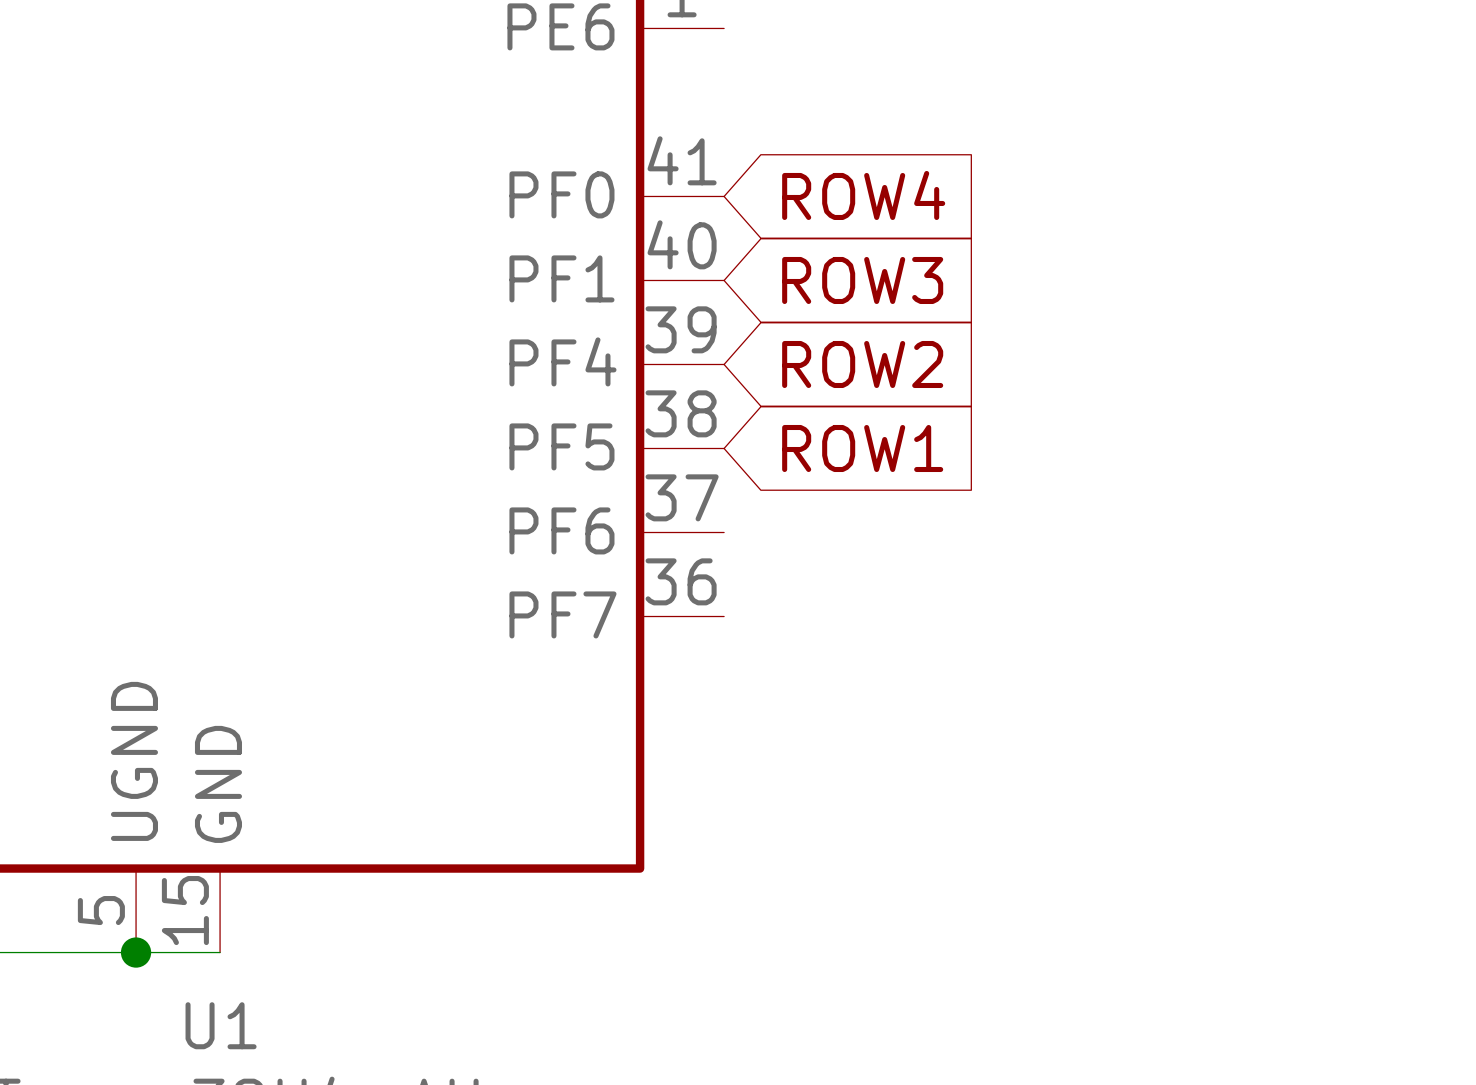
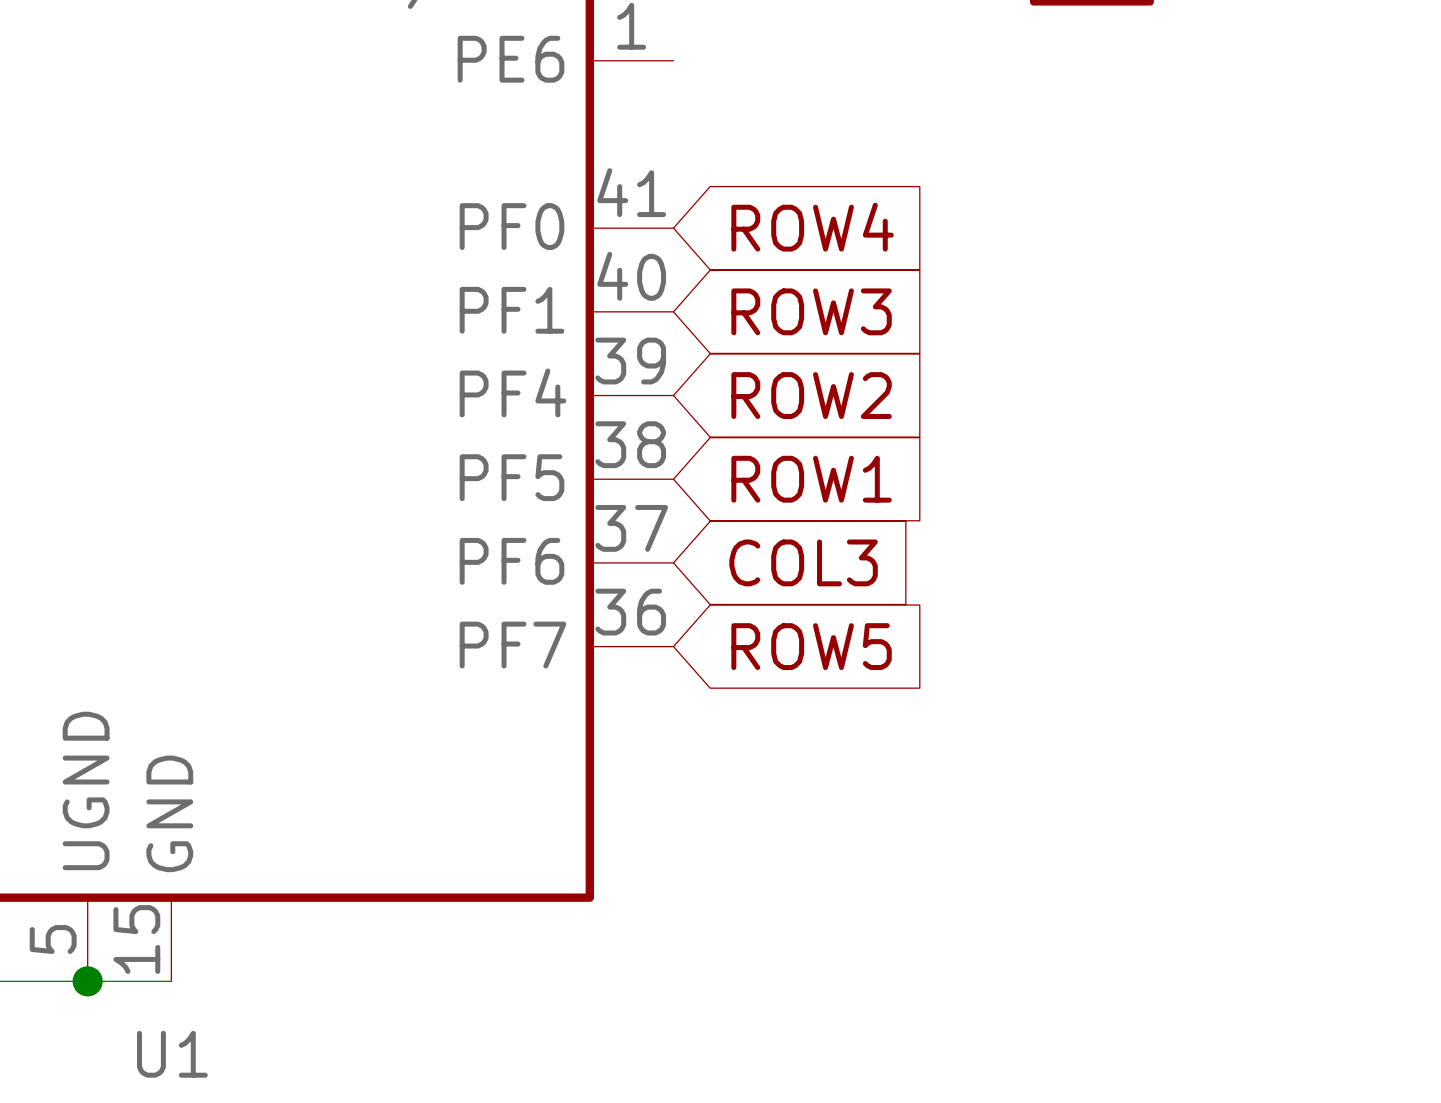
global label: none -> COL3 (803, 562)
global label: none -> ROW5 (811, 646)

